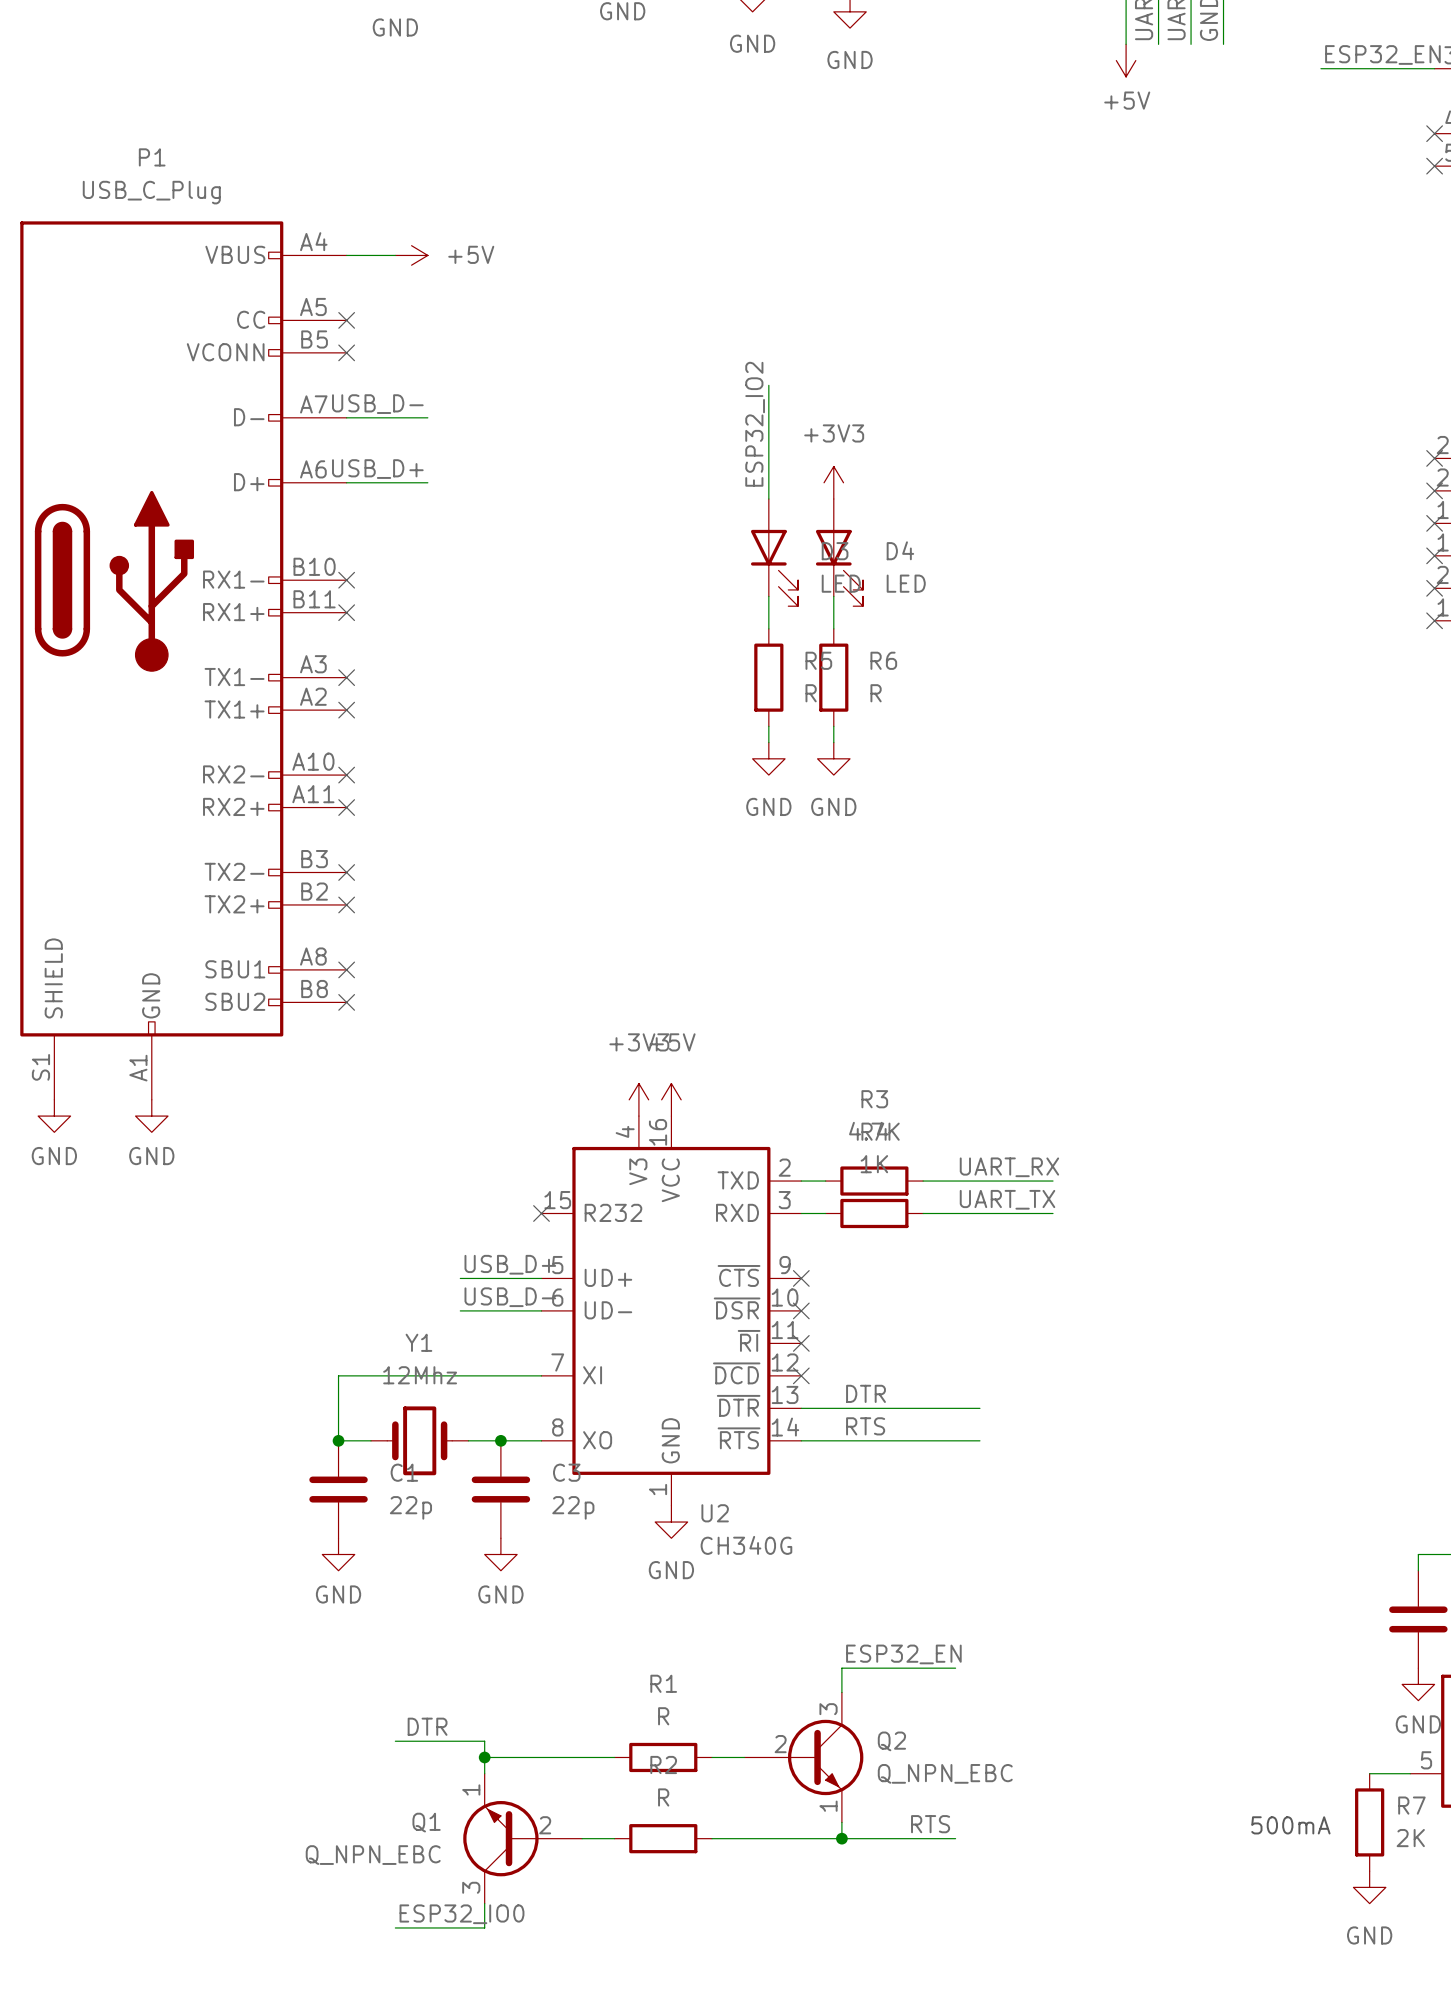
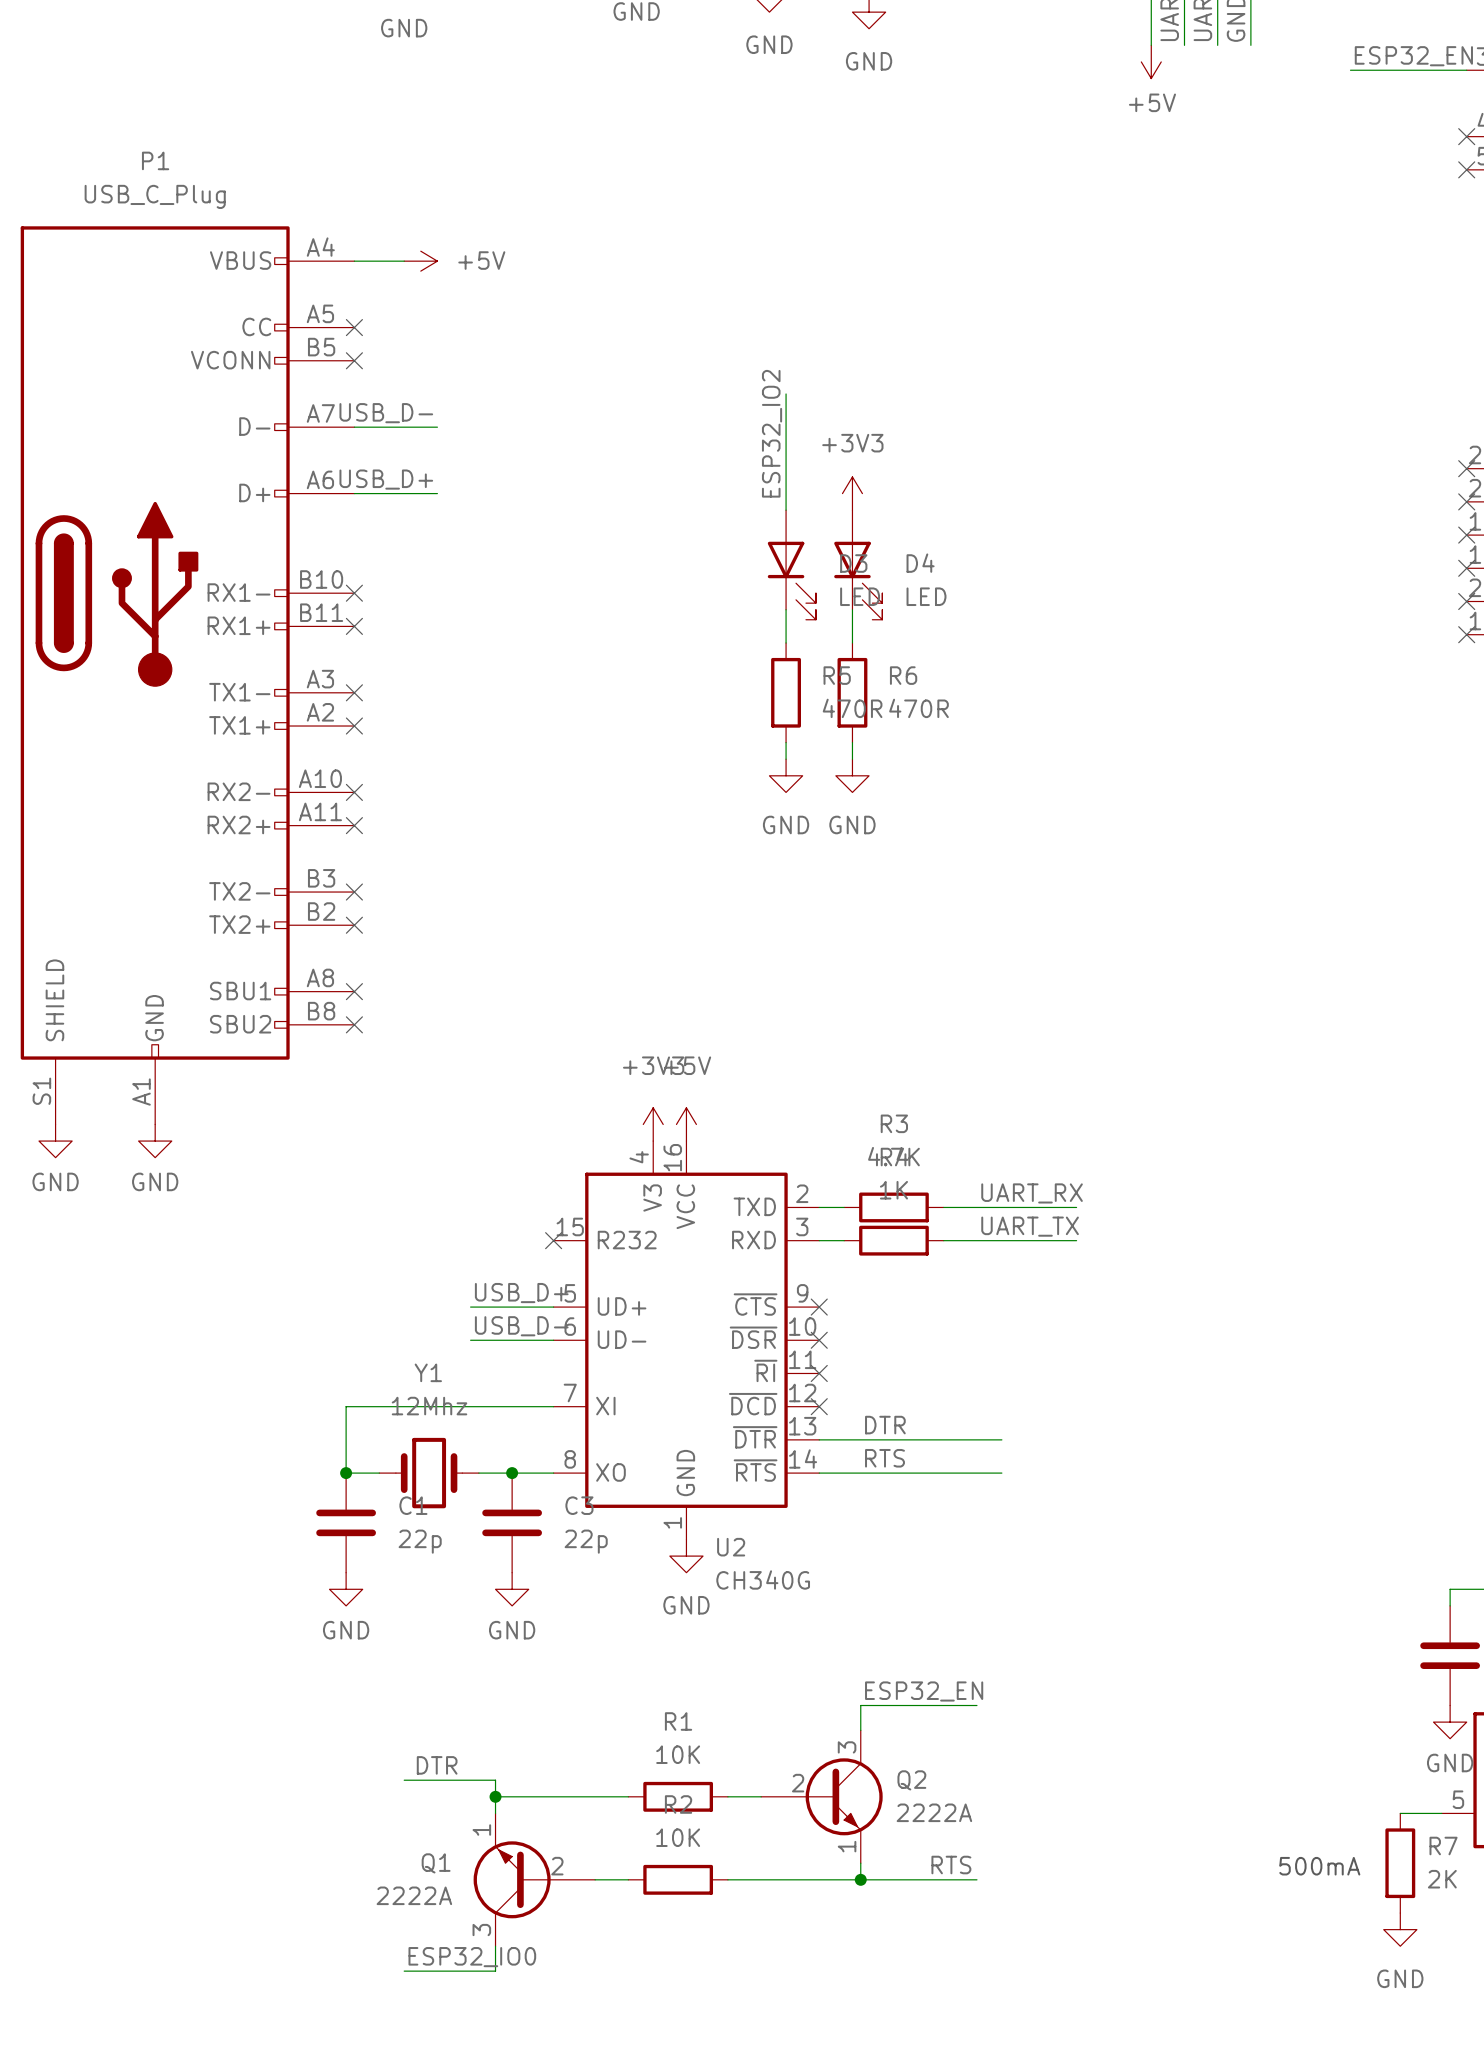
R5 value: R (811, 693) -> 470R (852, 708)
R6 value: R (876, 693) -> 470R (918, 708)
R1 value: R (663, 1716) -> 10K (678, 1754)
Q2 value: Q_NPN_EBC (945, 1773) -> 2222A (934, 1812)
R2 value: R (663, 1797) -> 10K (678, 1837)
Q1 value: Q_NPN_EBC (373, 1855) -> 2222A (414, 1895)

